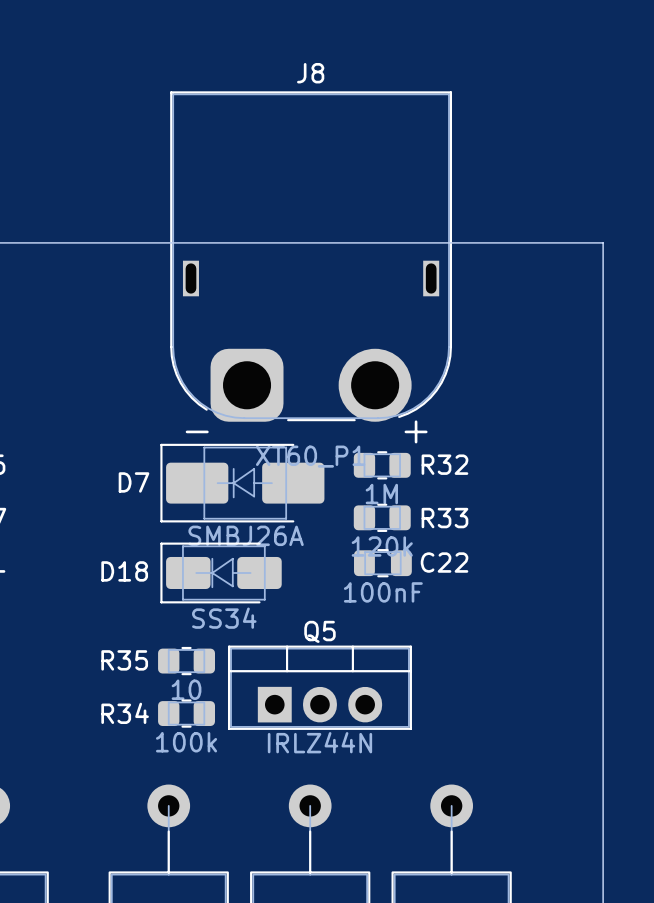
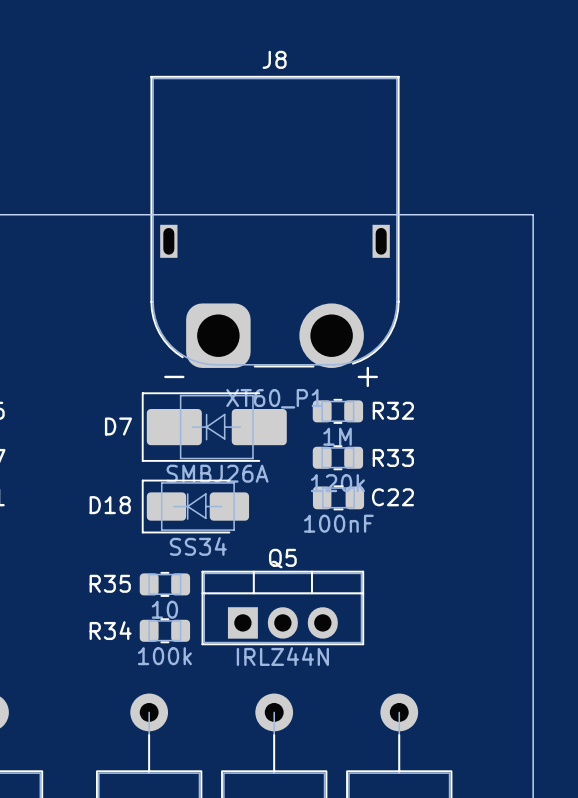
J8 footprint: [170, 91, 453, 422] -> [150, 75, 400, 368]

